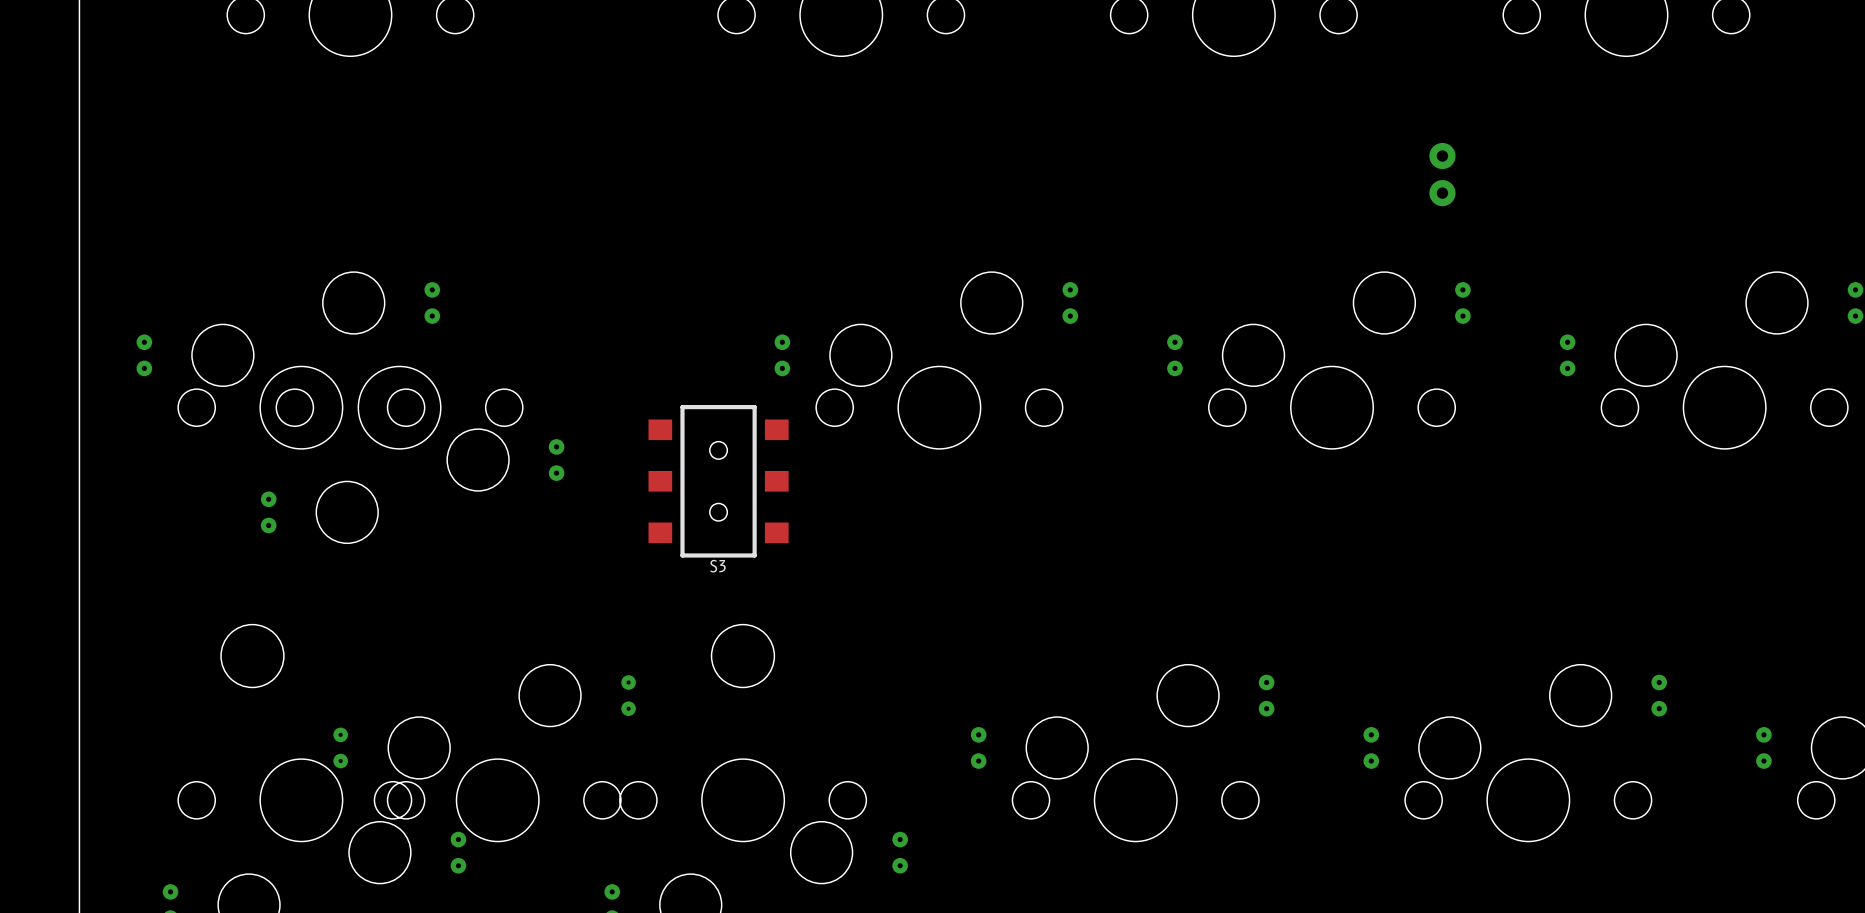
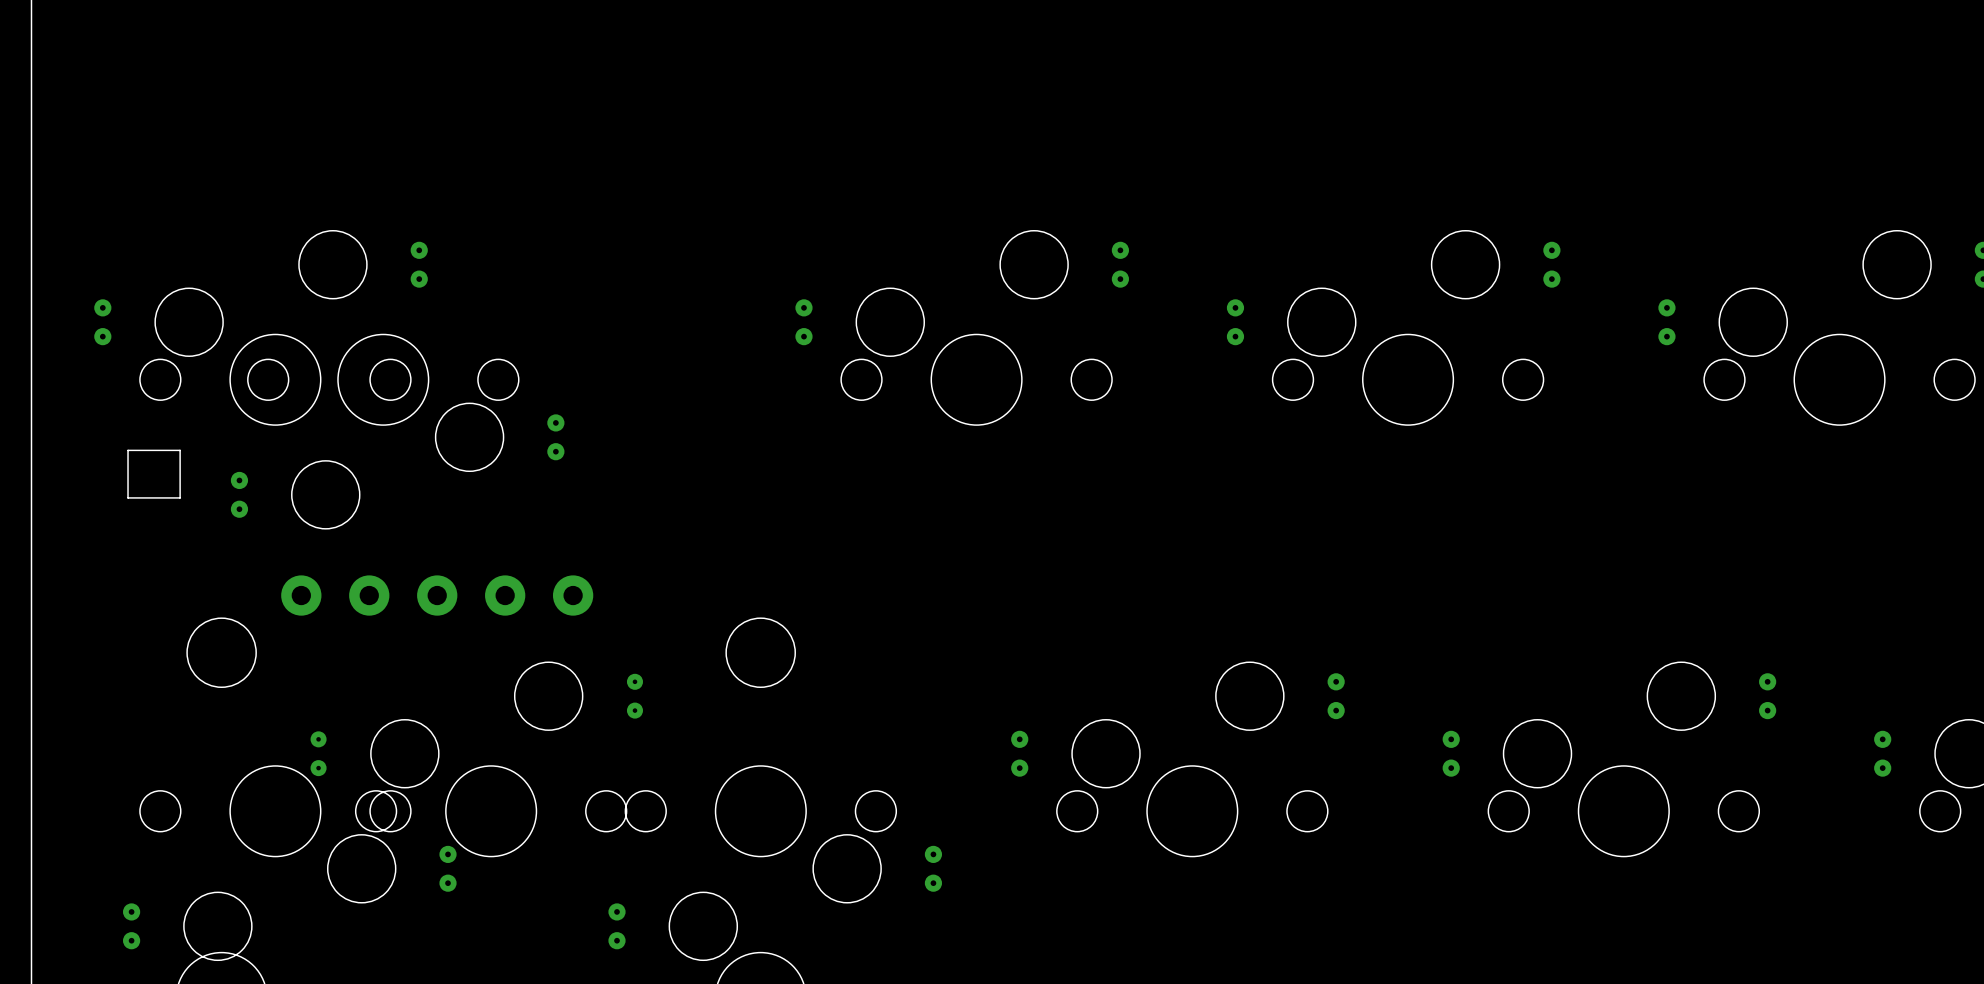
part: (1442, 174) -> none
S3: (718, 481) -> none
part: none -> (154, 474)
part: none -> (437, 595)

